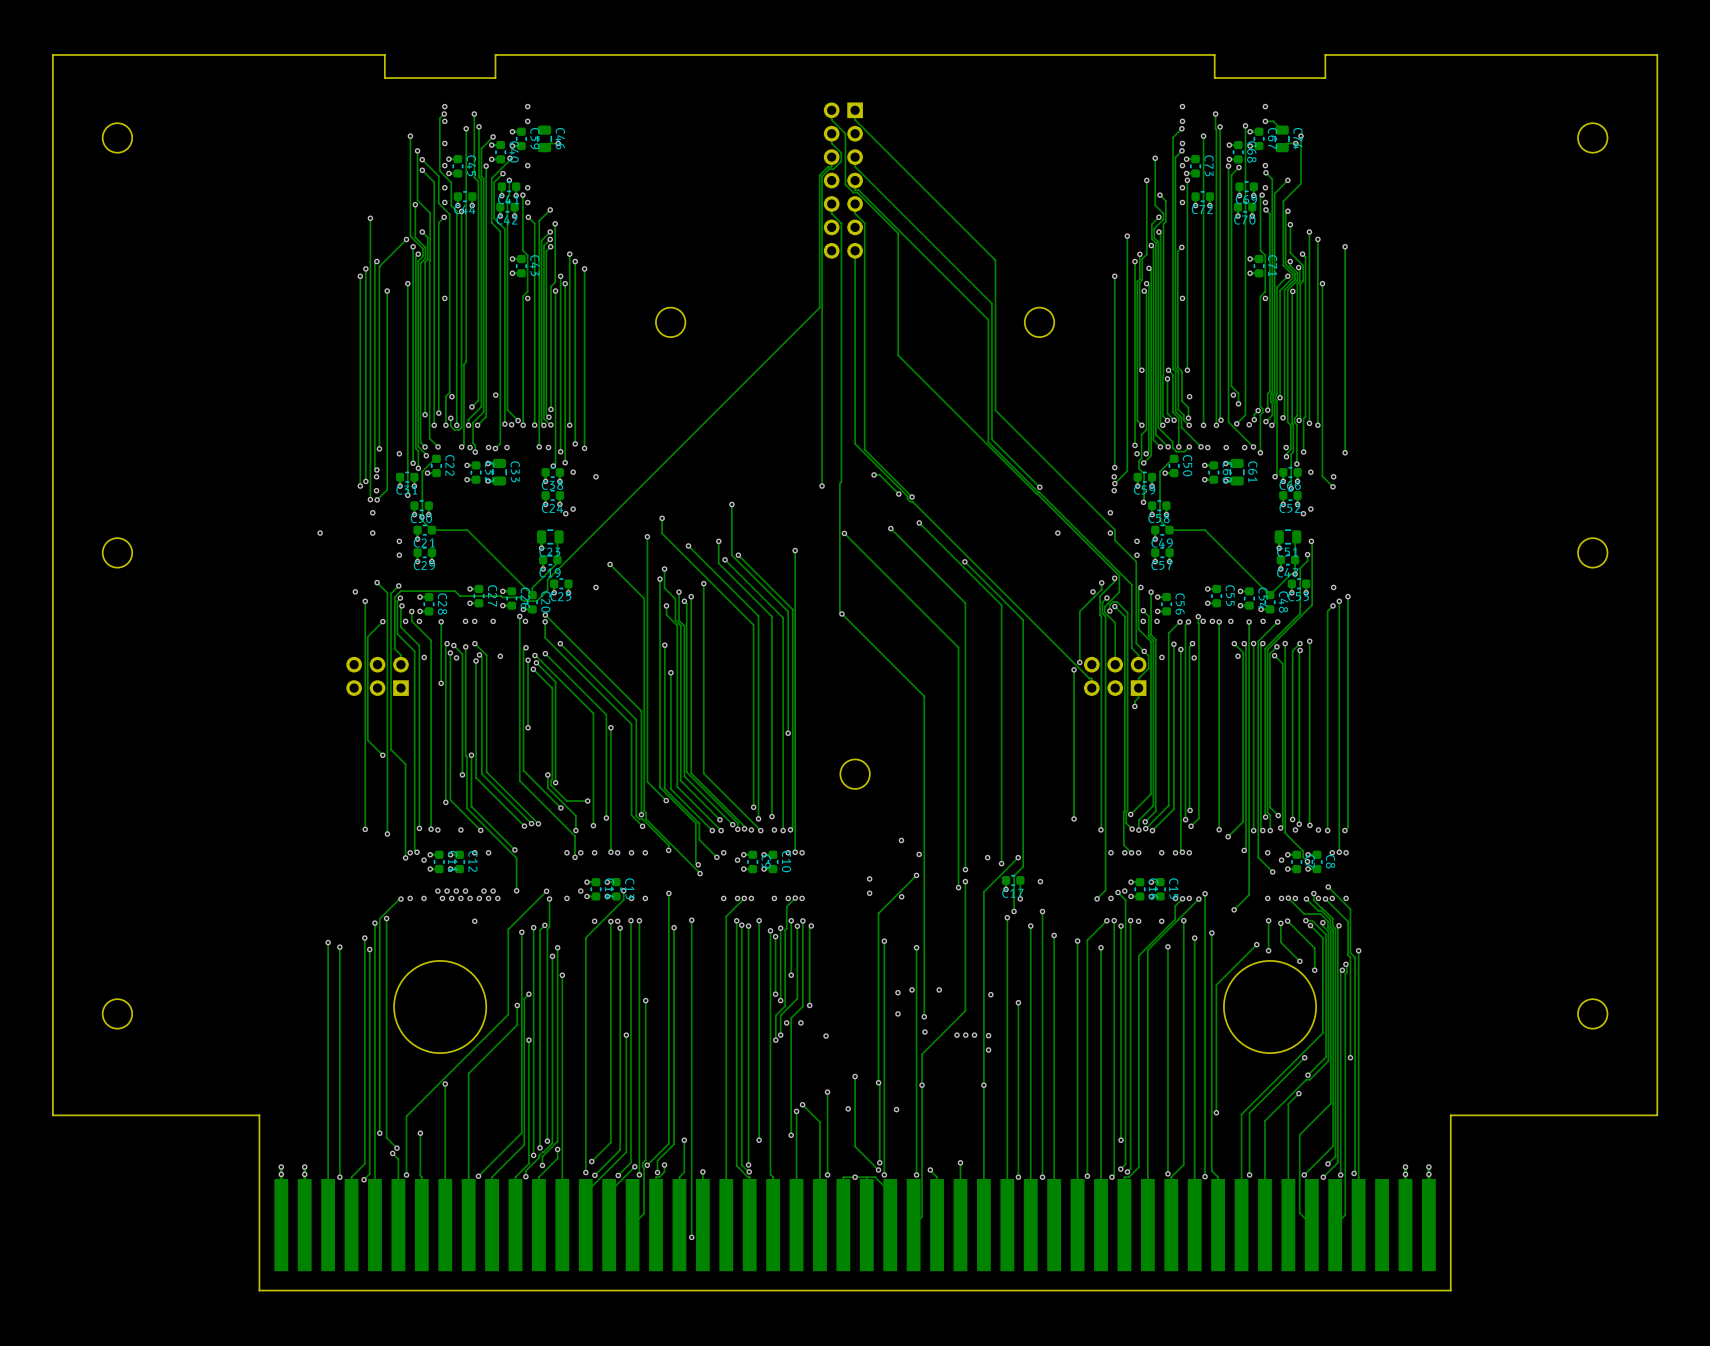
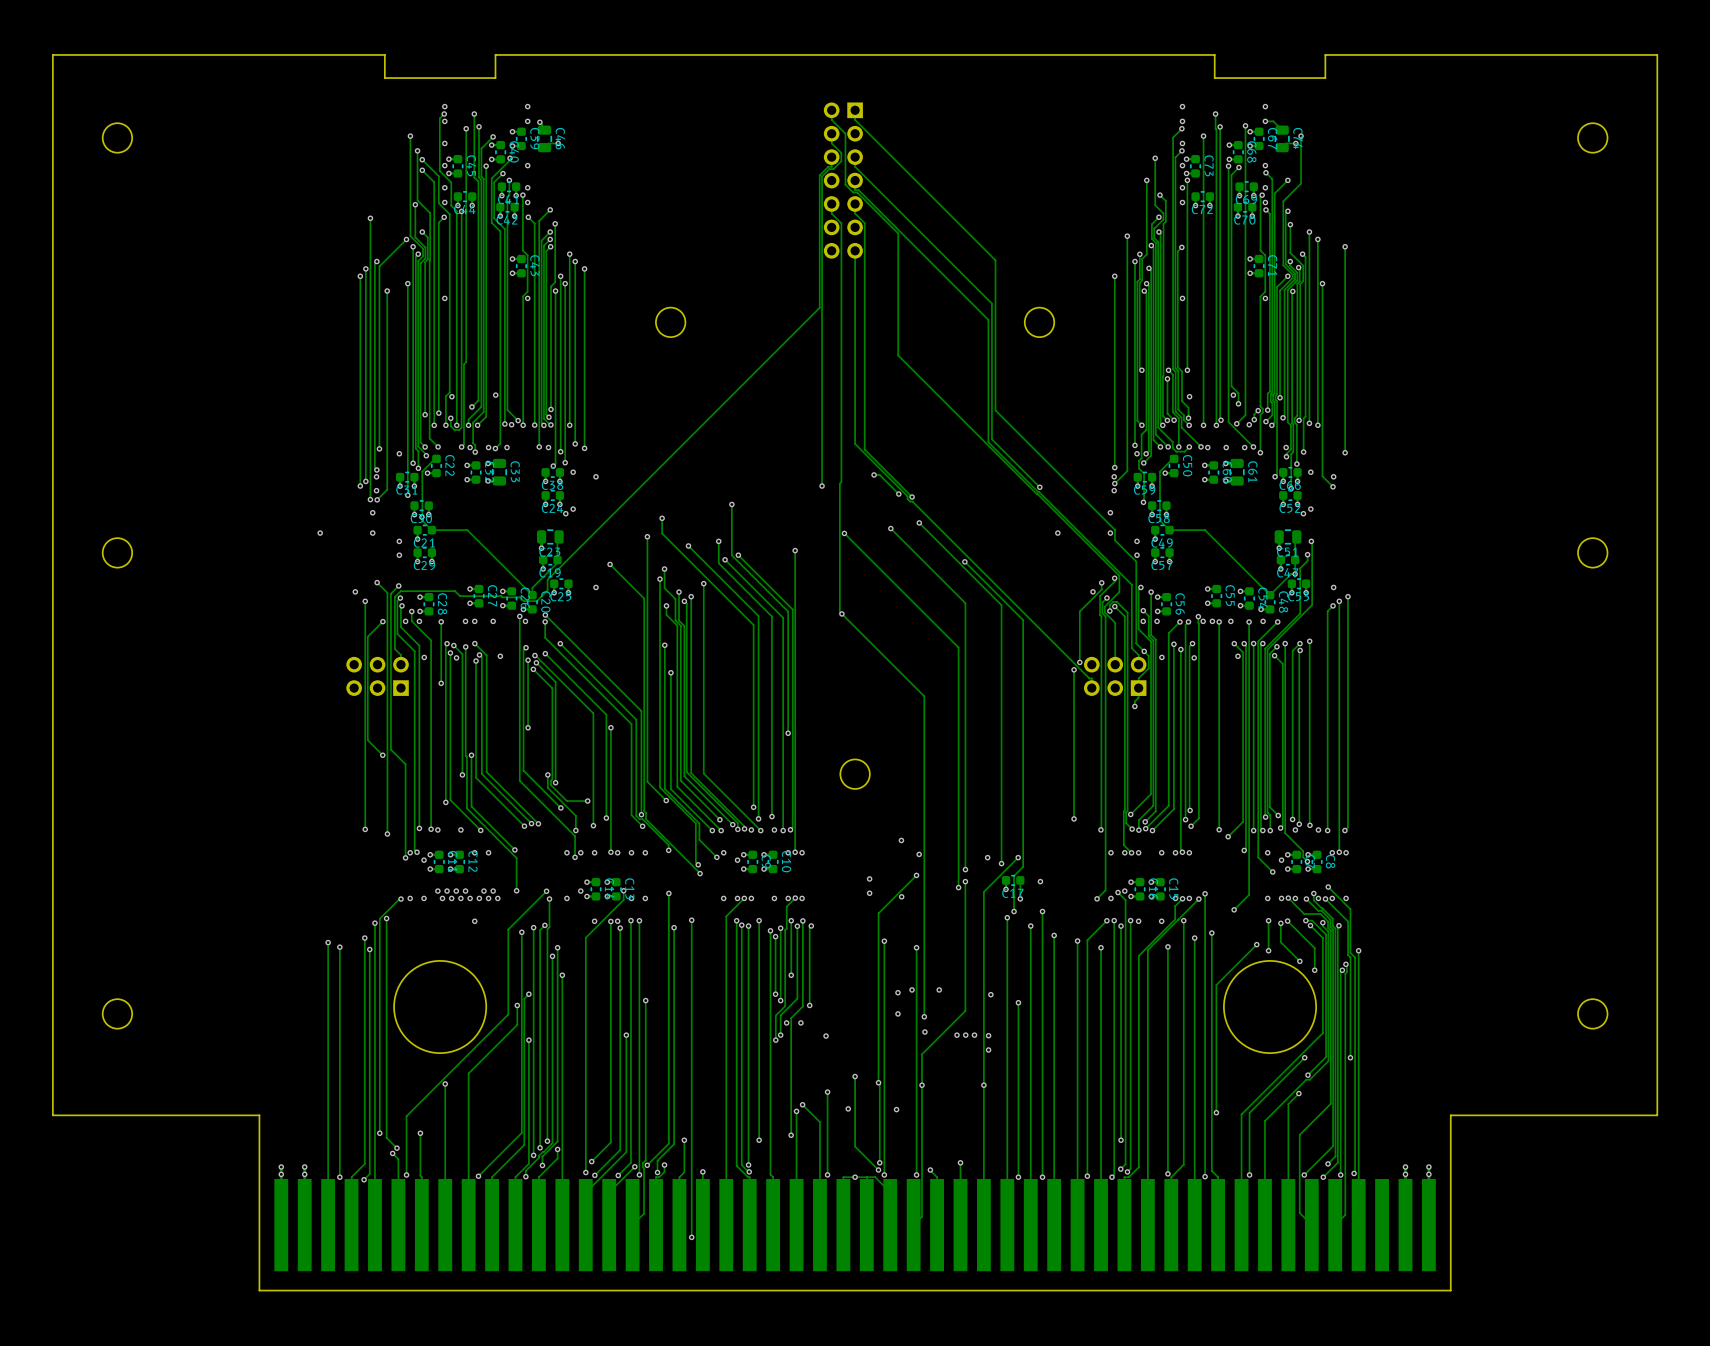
track: none -> (539, 122) (542, 125)
via: none -> (539, 122)

